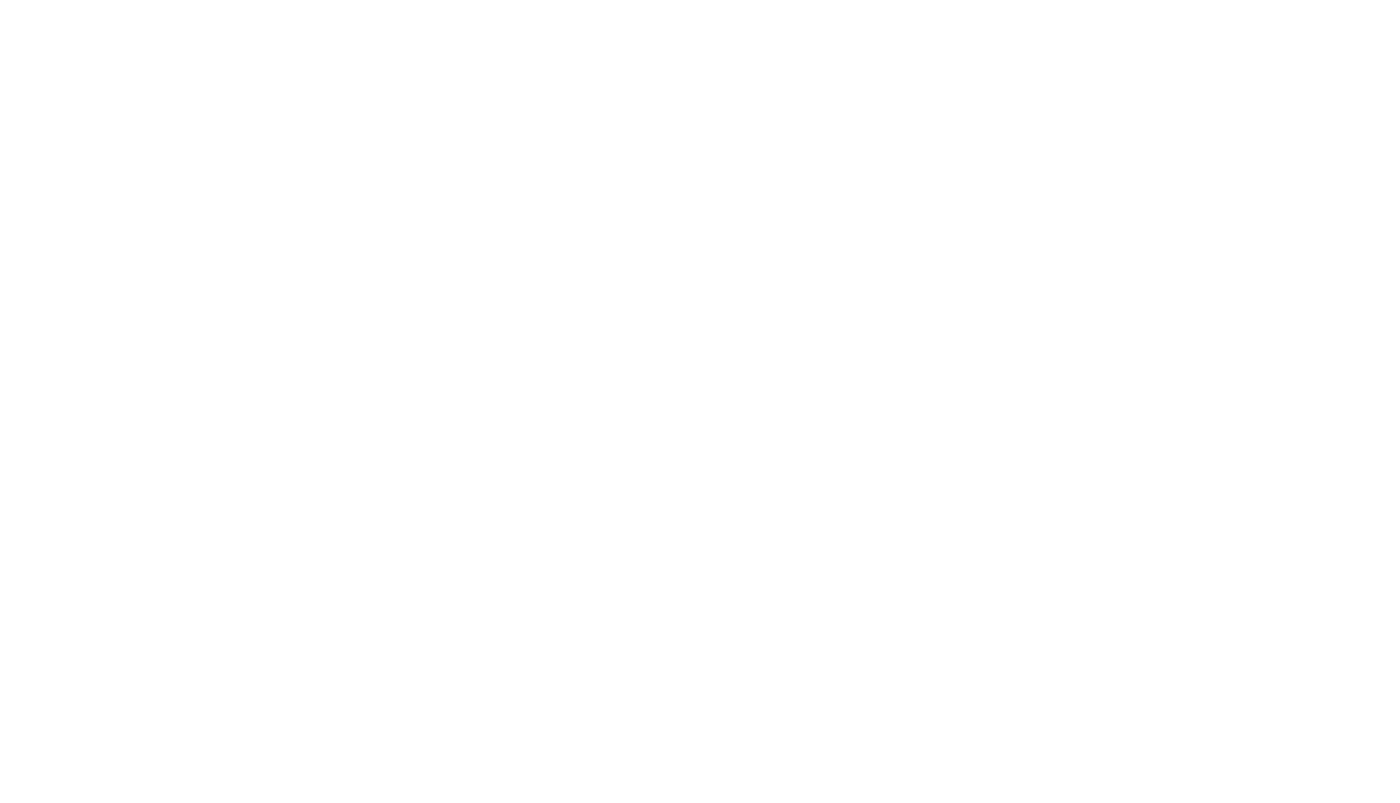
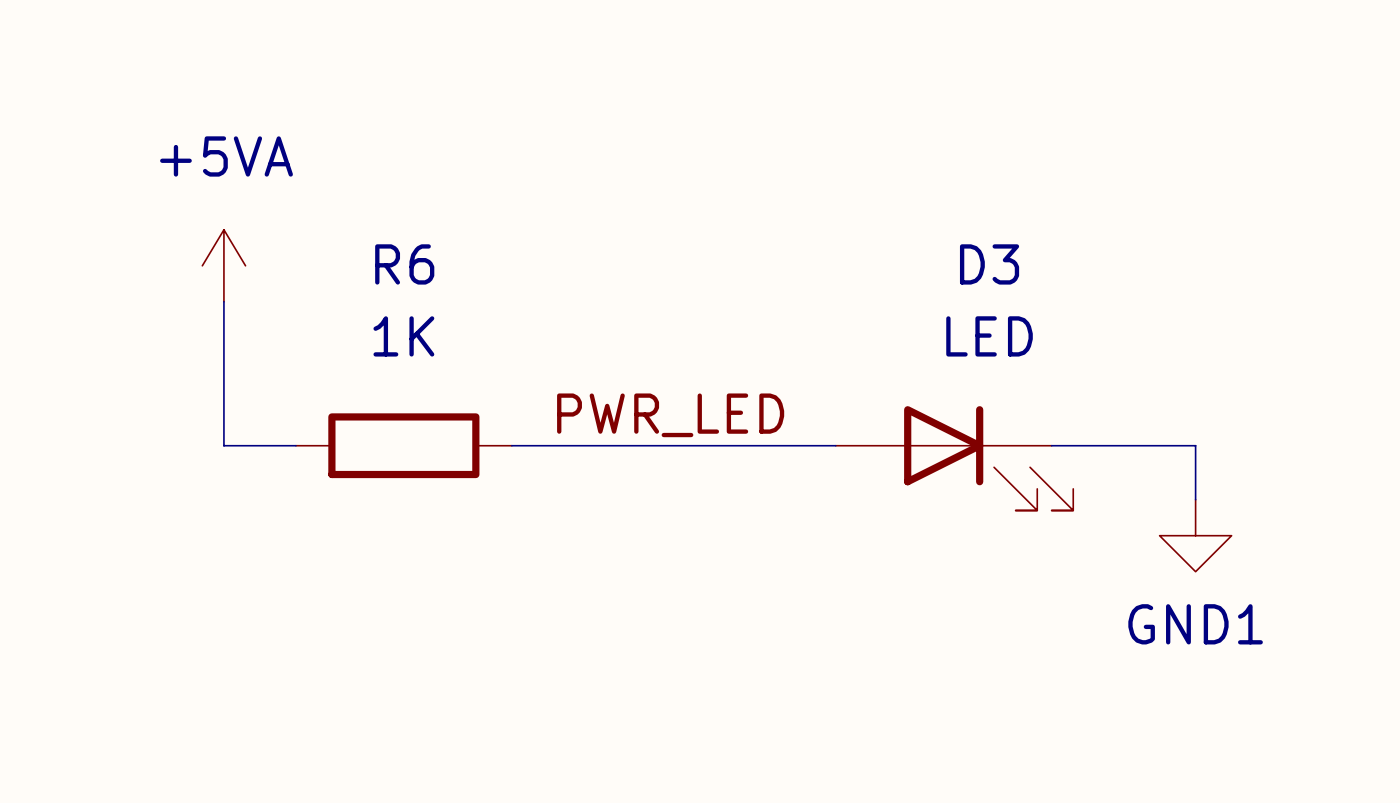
power symbol: none -> +5VA (223, 265)
wire: none -> (223, 301) (223, 445) (295, 445)
label: none -> PWR_LED (670, 415)
R6: none -> 1K (403, 445)
wire: none -> (511, 445) (835, 445)
wire: none -> (1051, 445) (1195, 445) (1195, 499)
D3: none -> LED (954, 458)
power symbol: none -> GND1 (1195, 535)

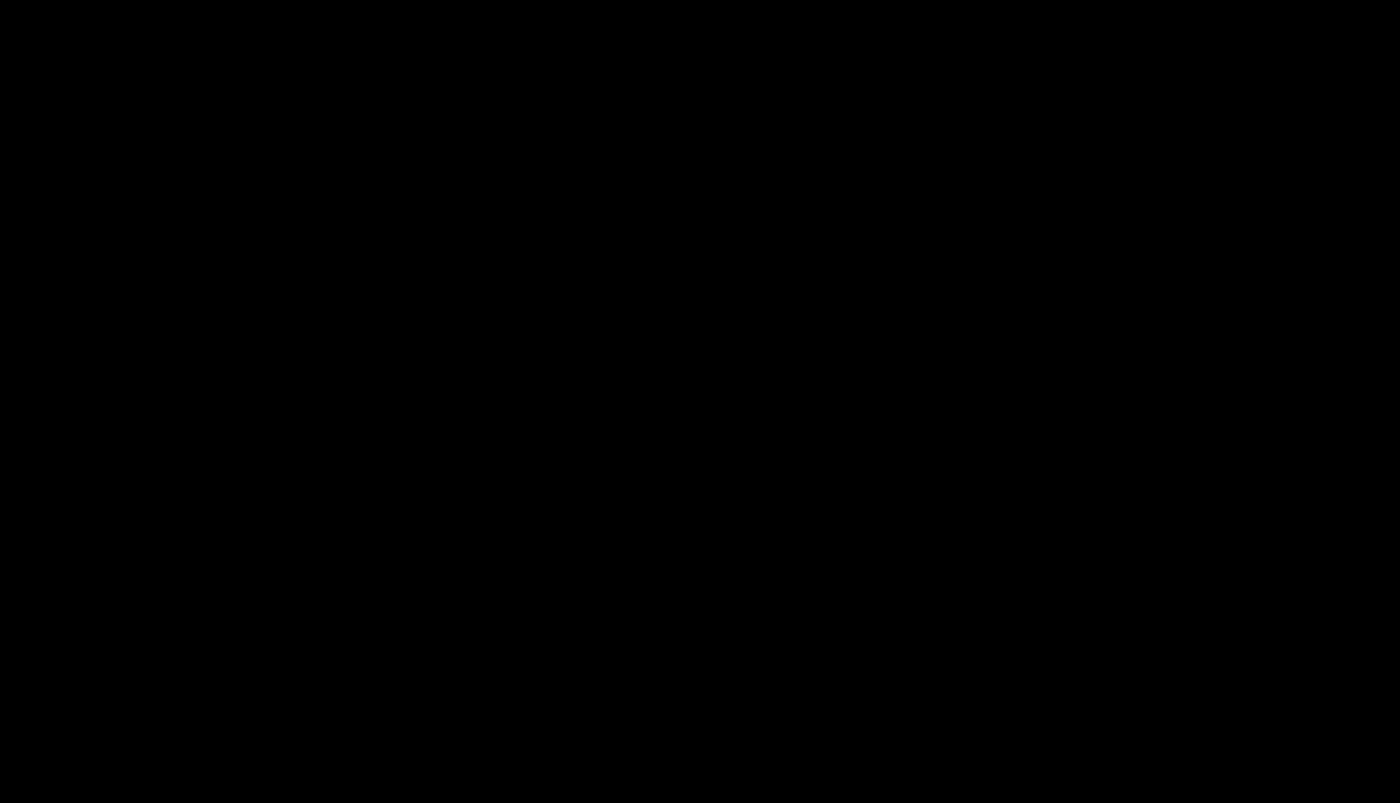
power symbol: +5VA (223, 265) -> none
wire: (223, 301) (223, 445) (295, 445) -> none
label: PWR_LED (670, 415) -> none
R6: 1K (403, 445) -> none
wire: (511, 445) (835, 445) -> none
wire: (1051, 445) (1195, 445) (1195, 499) -> none
D3: LED (954, 458) -> none
power symbol: GND1 (1195, 535) -> none

